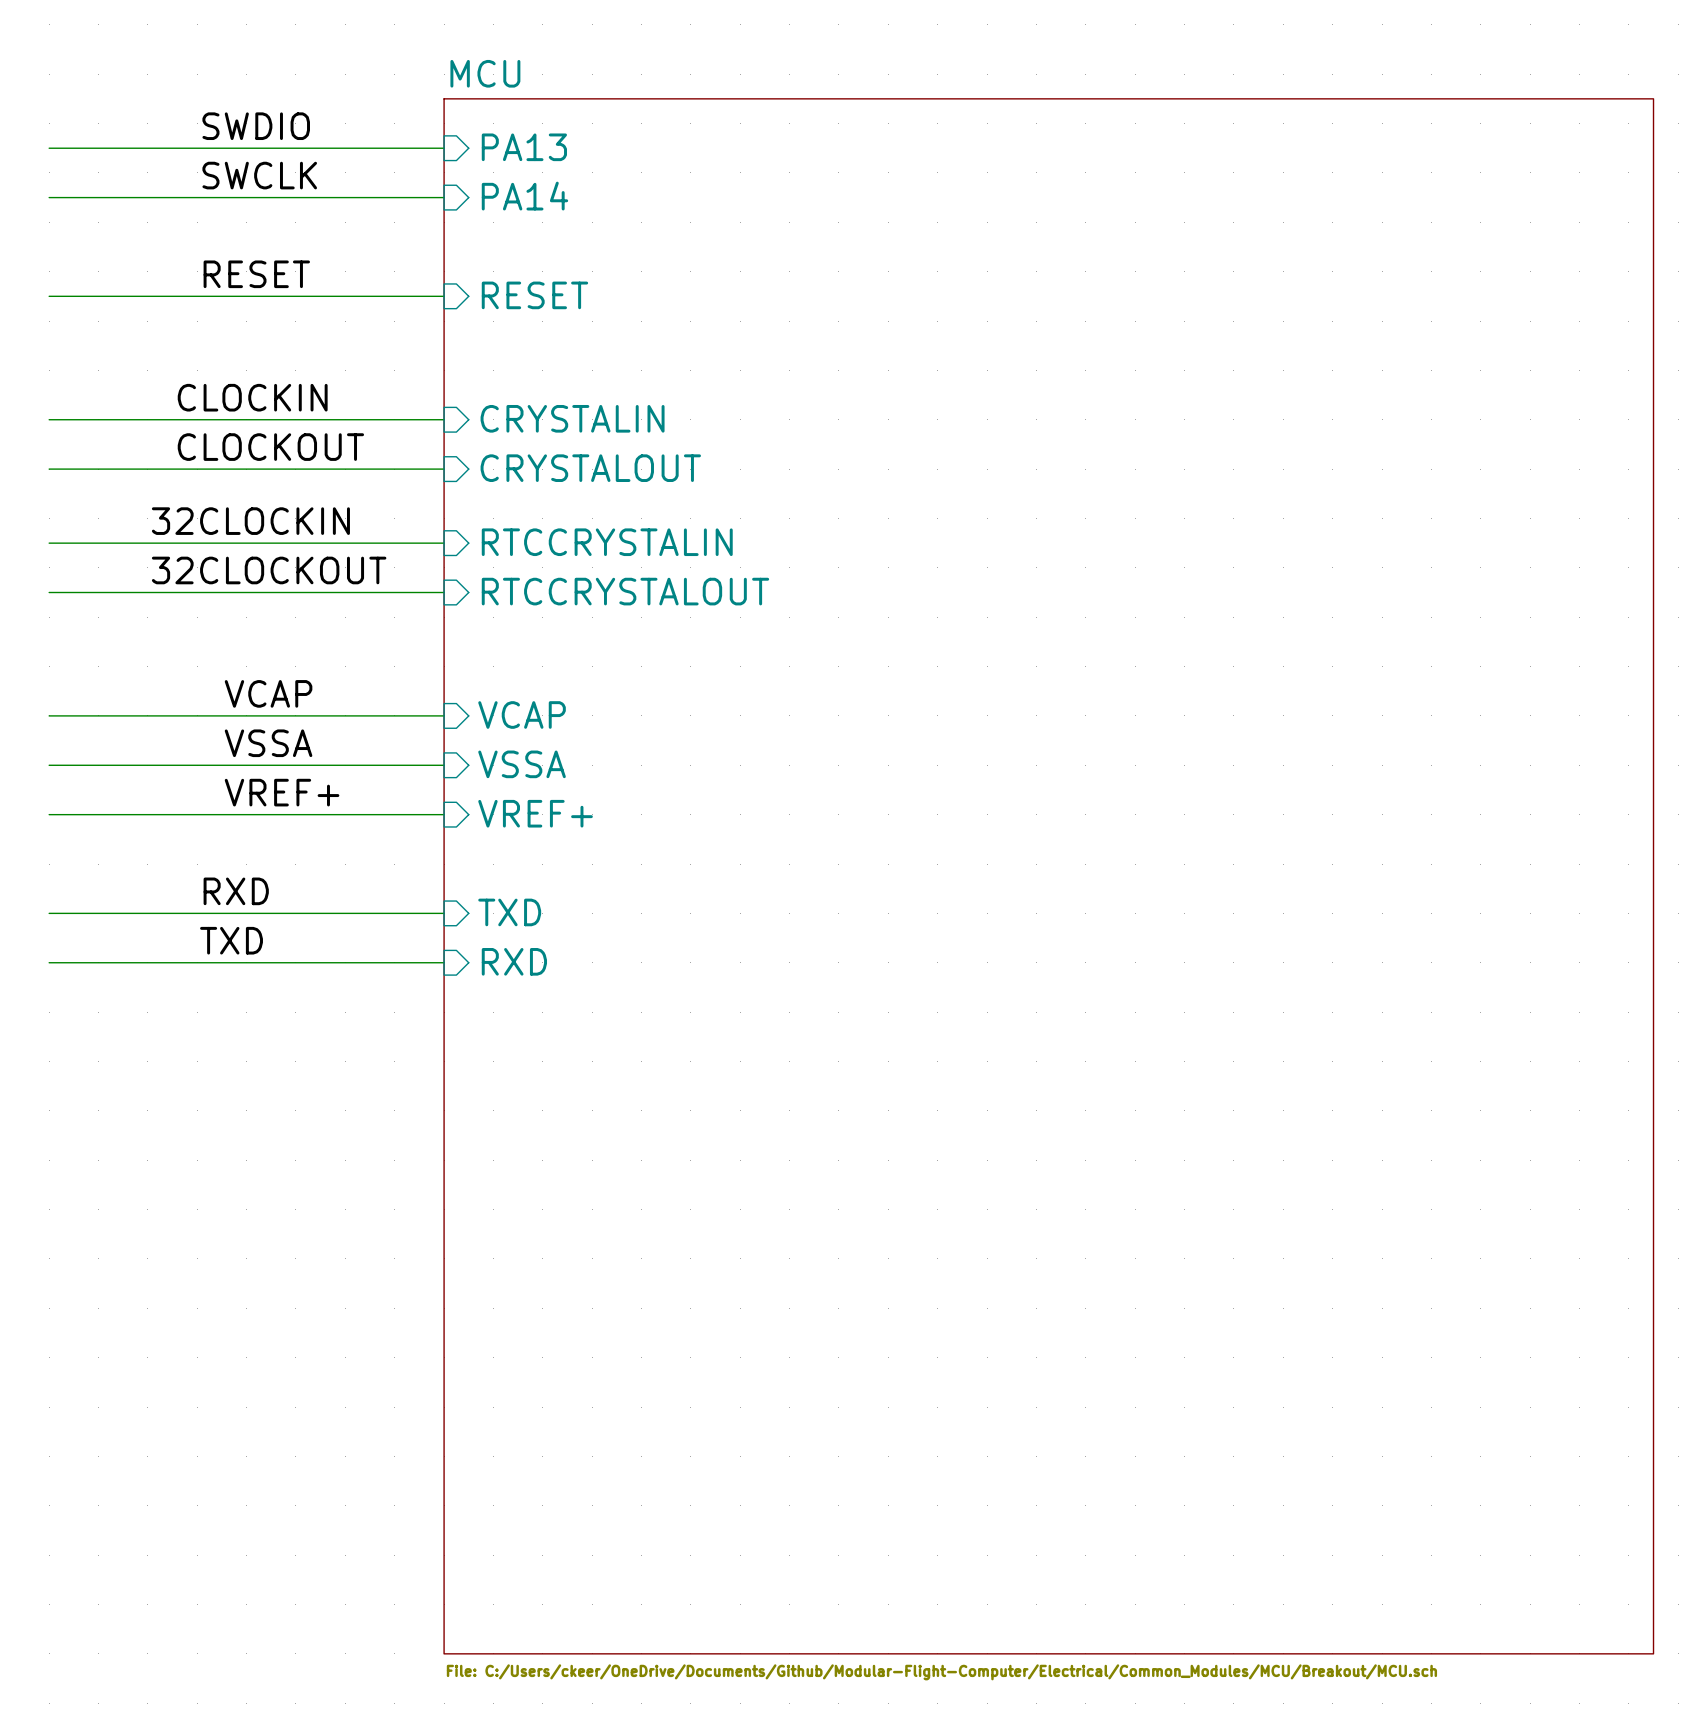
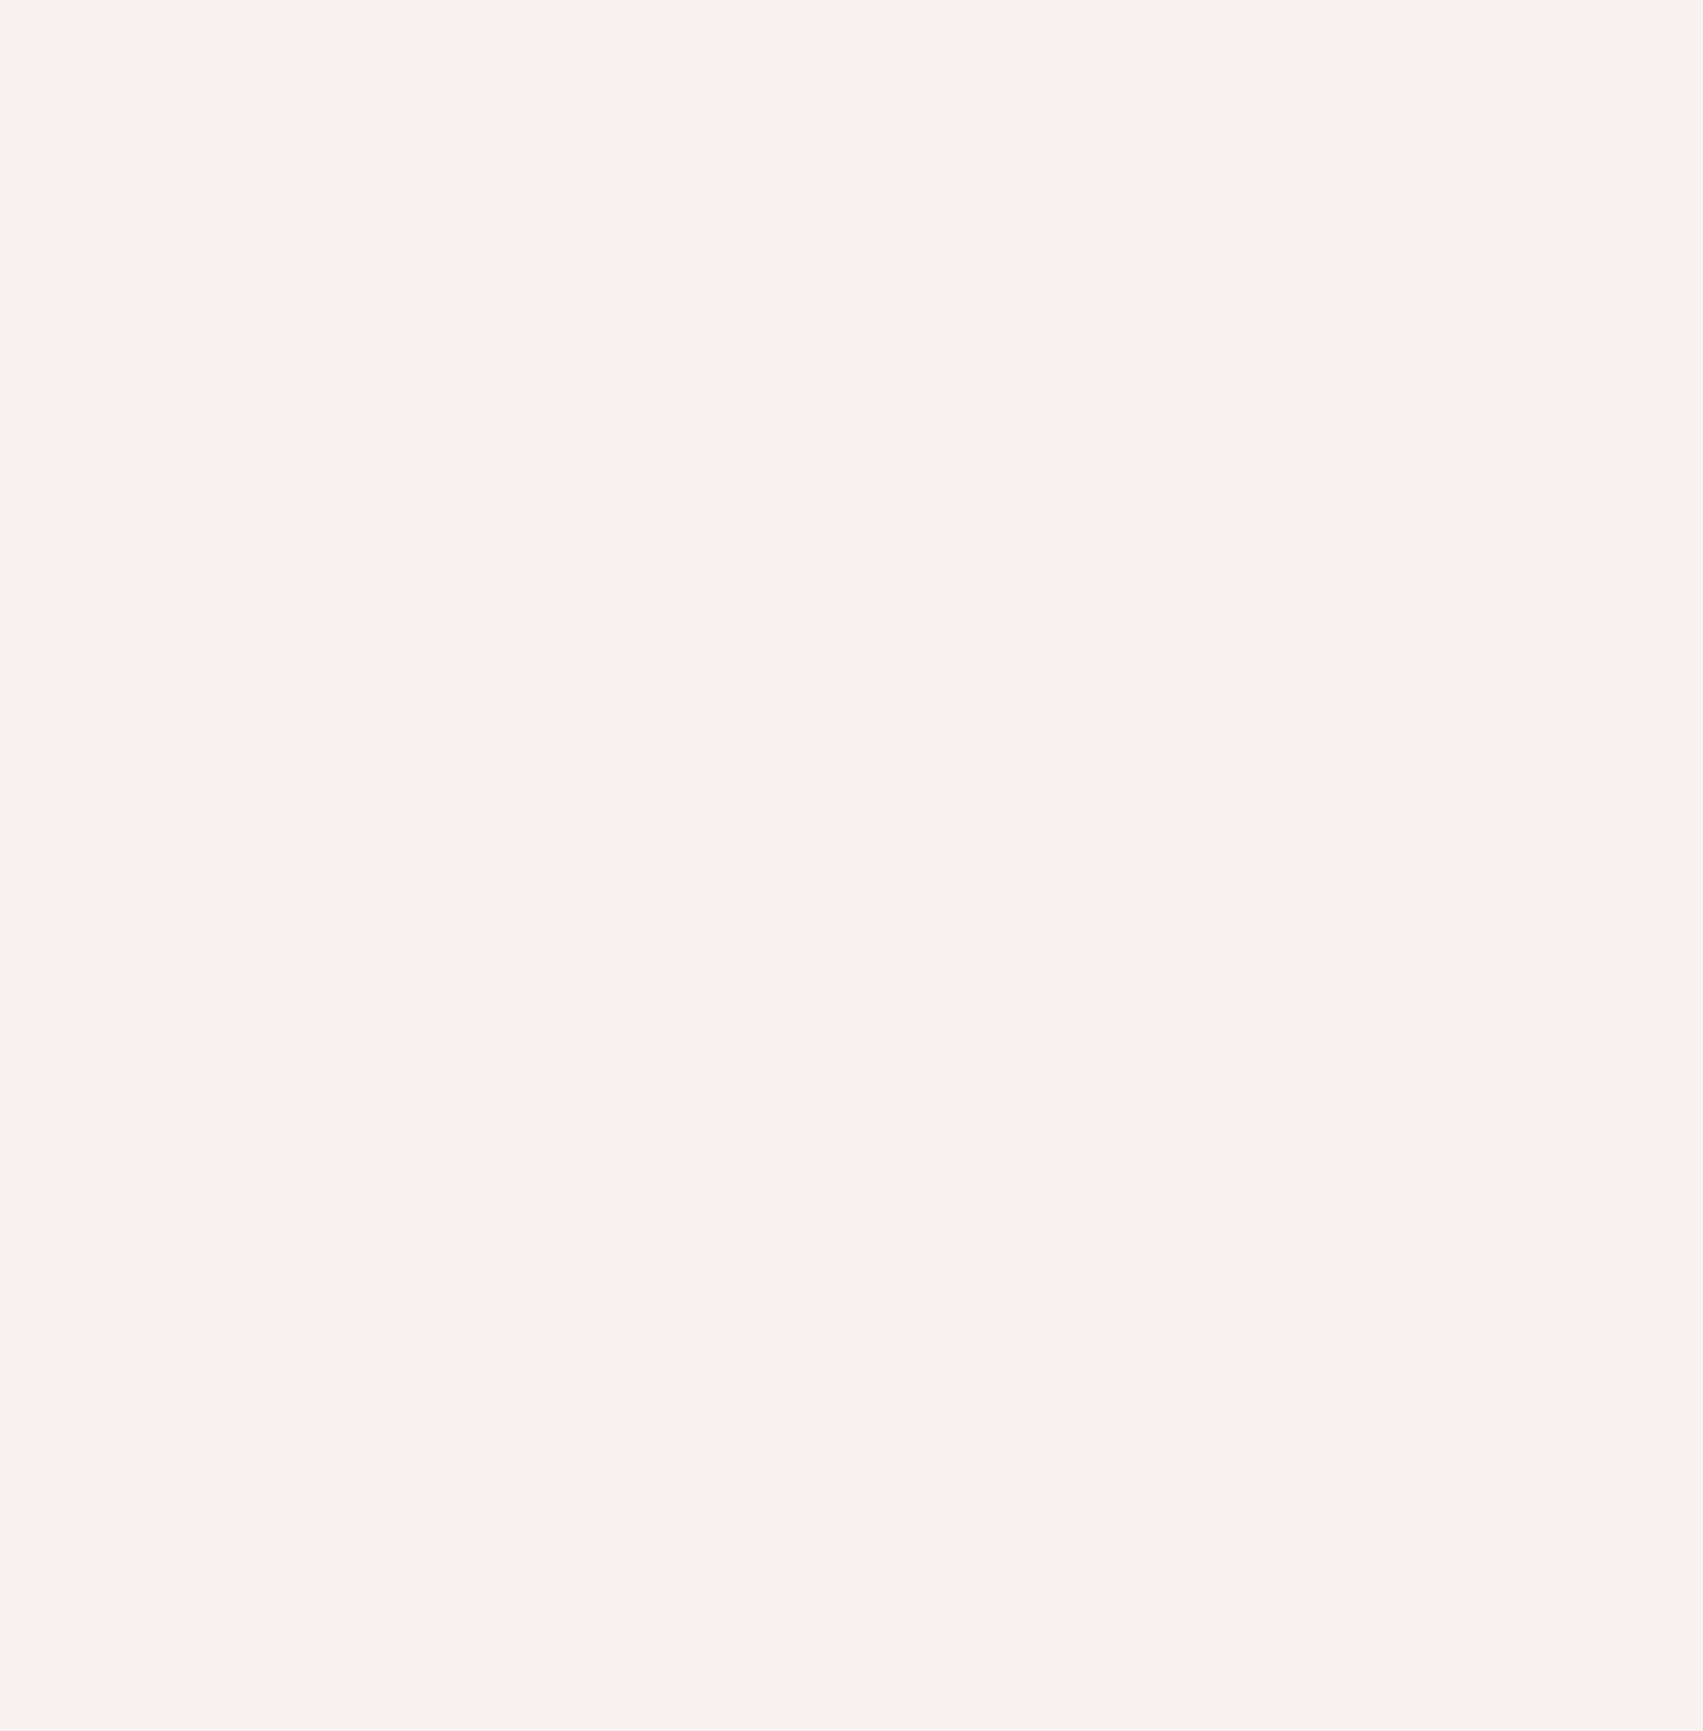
label: SWDIO (256, 126) -> none
sheet pin: PA13 (524, 147) -> none
wire: (49, 148) (444, 148) -> none
label: SWCLK (259, 175) -> none
sheet pin: PA14 (524, 196) -> none
wire: (49, 197) (444, 197) -> none
label: RESET (256, 274) -> none
sheet pin: RESET (534, 295) -> none
wire: (49, 296) (444, 296) -> none
label: CLOCKIN (252, 397) -> none
sheet pin: CRYSTALIN (572, 418) -> none
wire: (49, 419) (444, 419) -> none
label: CLOCKOUT (270, 447) -> none
sheet pin: CRYSTALOUT (590, 468) -> none
wire: (49, 469) (444, 469) -> none
label: 32CLOCKIN (250, 521) -> none
sheet pin: RTCCRYSTALIN (607, 542) -> none
wire: (49, 543) (444, 543) -> none
label: 32CLOCKOUT (269, 570) -> none
sheet pin: RTCCRYSTALOUT (625, 591) -> none
wire: (49, 592) (444, 592) -> none
label: VCAP (268, 693) -> none
sheet pin: VCAP (522, 714) -> none
wire: (49, 715) (444, 715) -> none
label: VSSA (268, 743) -> none
sheet pin: VSSA (522, 764) -> none
wire: (49, 765) (444, 765) -> none
label: VREF+ (282, 792) -> none
sheet pin: VREF+ (535, 813) -> none
wire: (49, 814) (444, 814) -> none
sheet MCU: File: C:/Users/ckeer/OneDrive/Documents/Github/Modular-Flight-Computer/Electrical/Common_Modules/MCU/Breakout/MCU.sch (1048, 876) -> none
label: RXD (236, 891) -> none
sheet pin: TXD (509, 912) -> none
wire: (49, 913) (444, 913) -> none
label: TXD (231, 940) -> none
sheet pin: RXD (514, 961) -> none
wire: (49, 962) (444, 962) -> none

